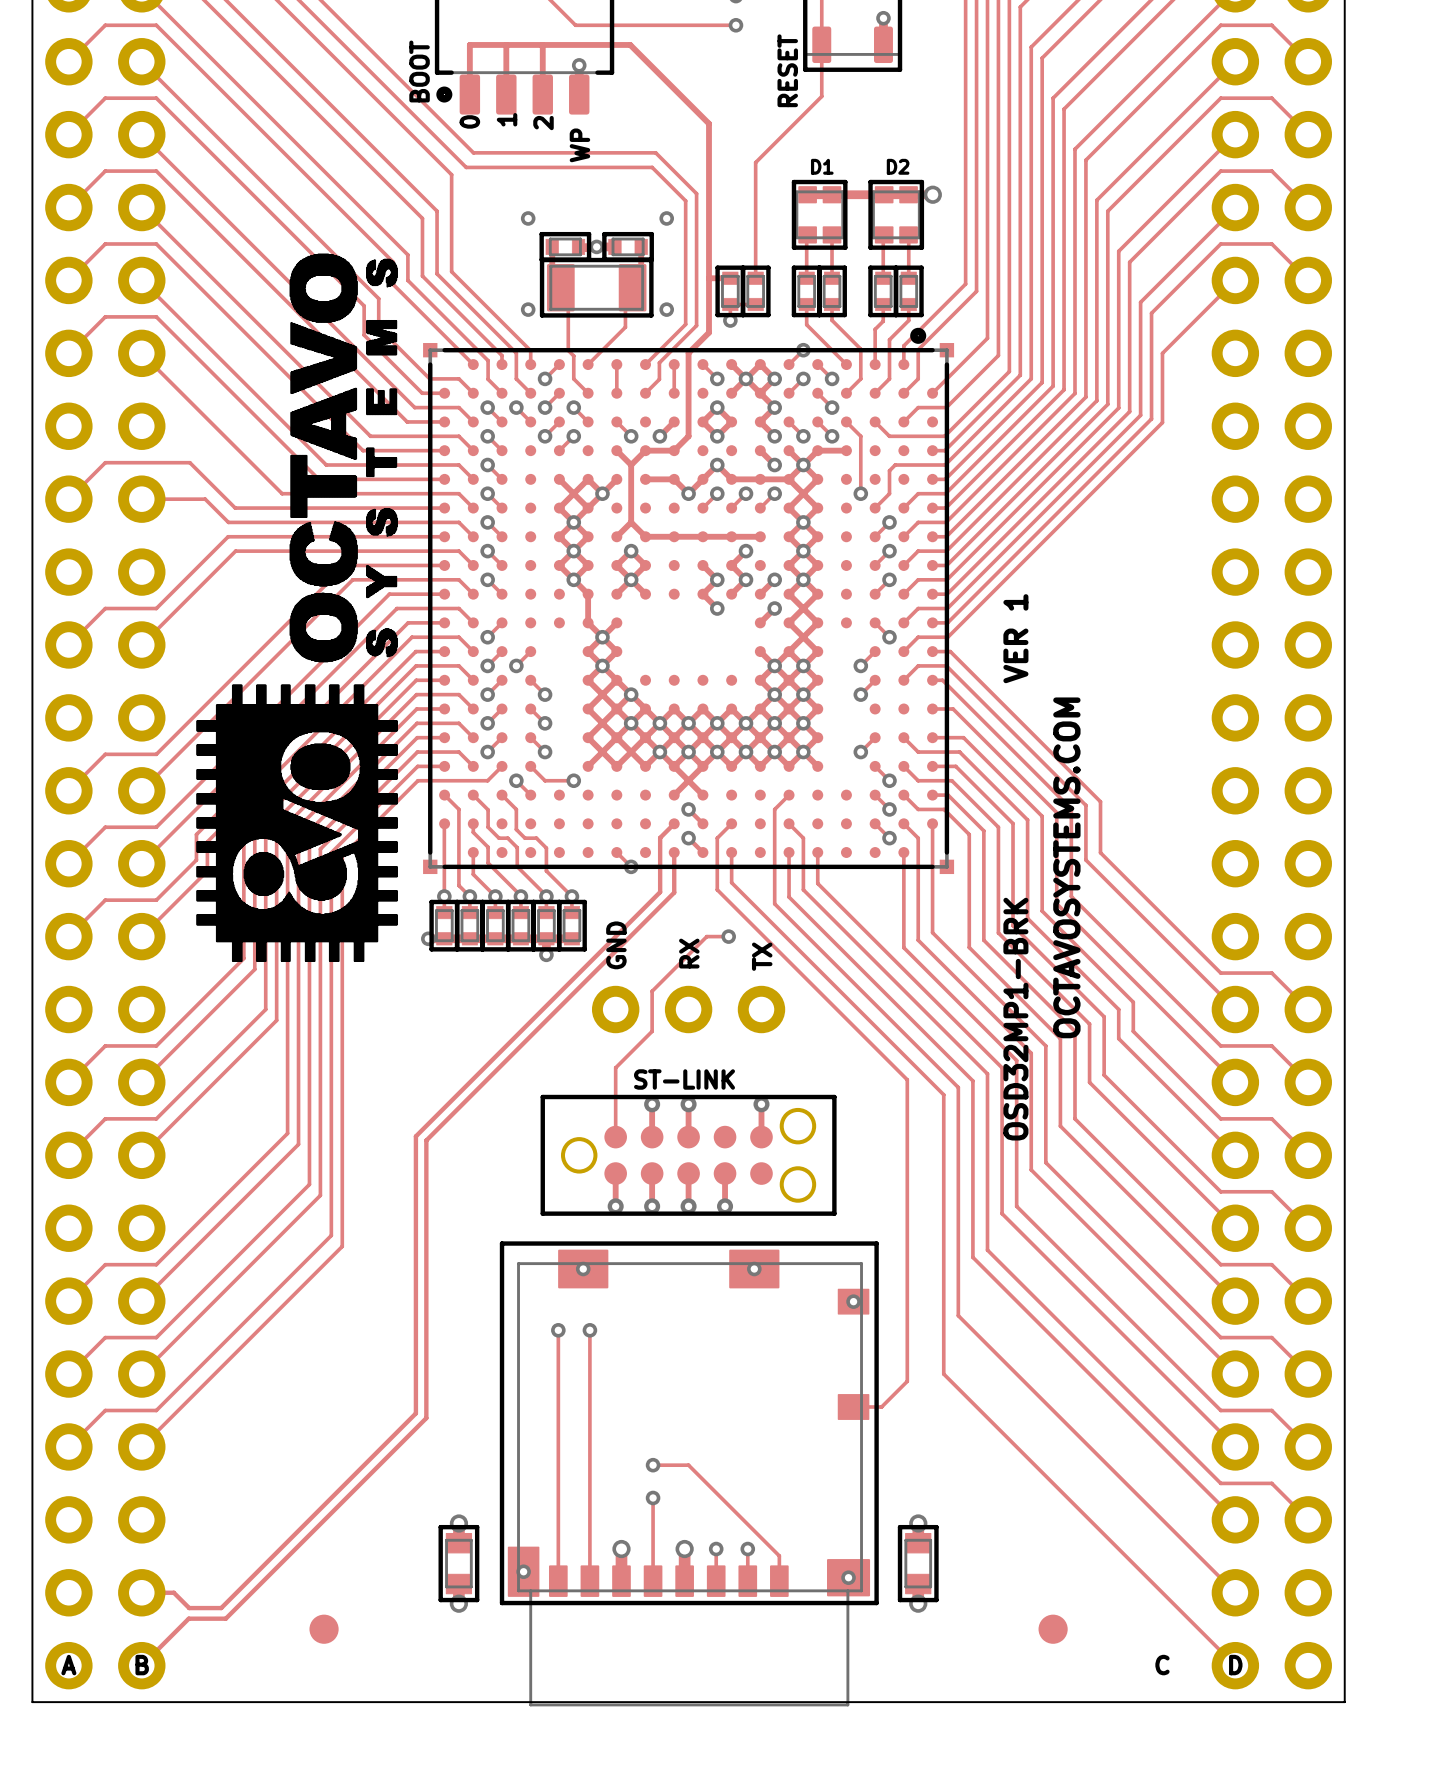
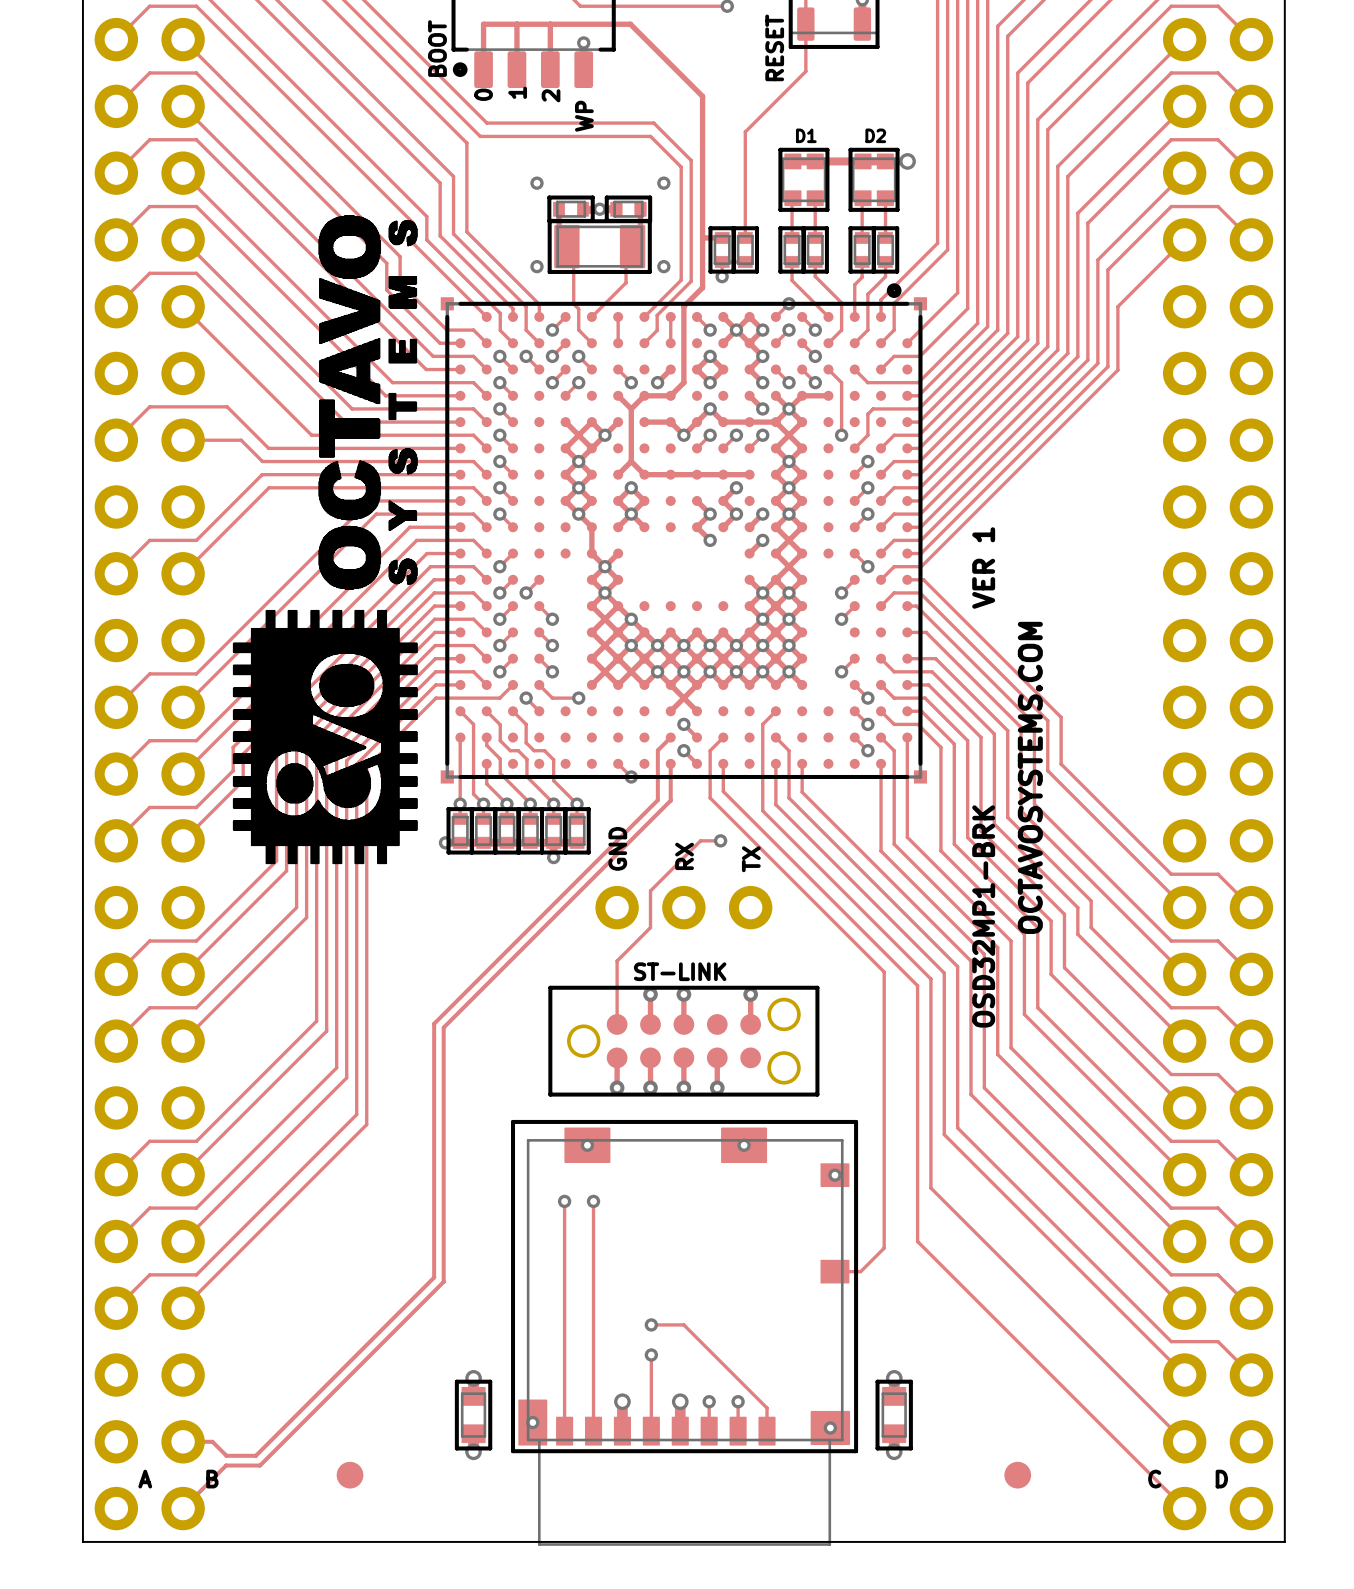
text position: A (68, 1665) -> A (145, 1479)
text position: B (142, 1665) -> B (212, 1479)
text position: C (1162, 1665) -> C (1154, 1479)
text position: D (1235, 1665) -> D (1221, 1479)

